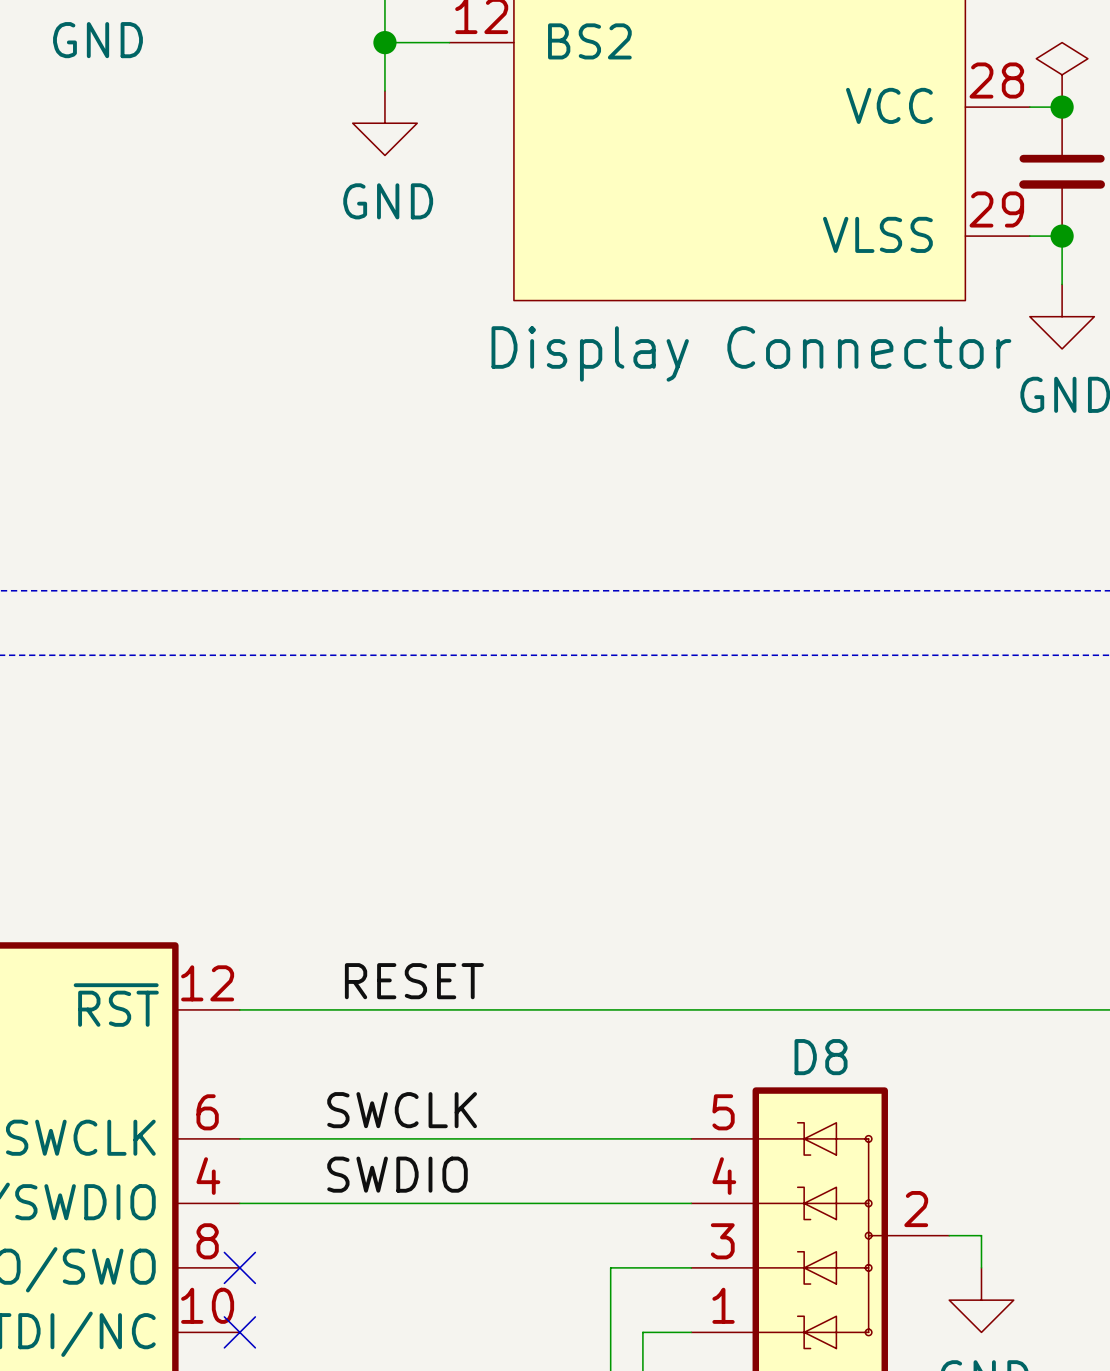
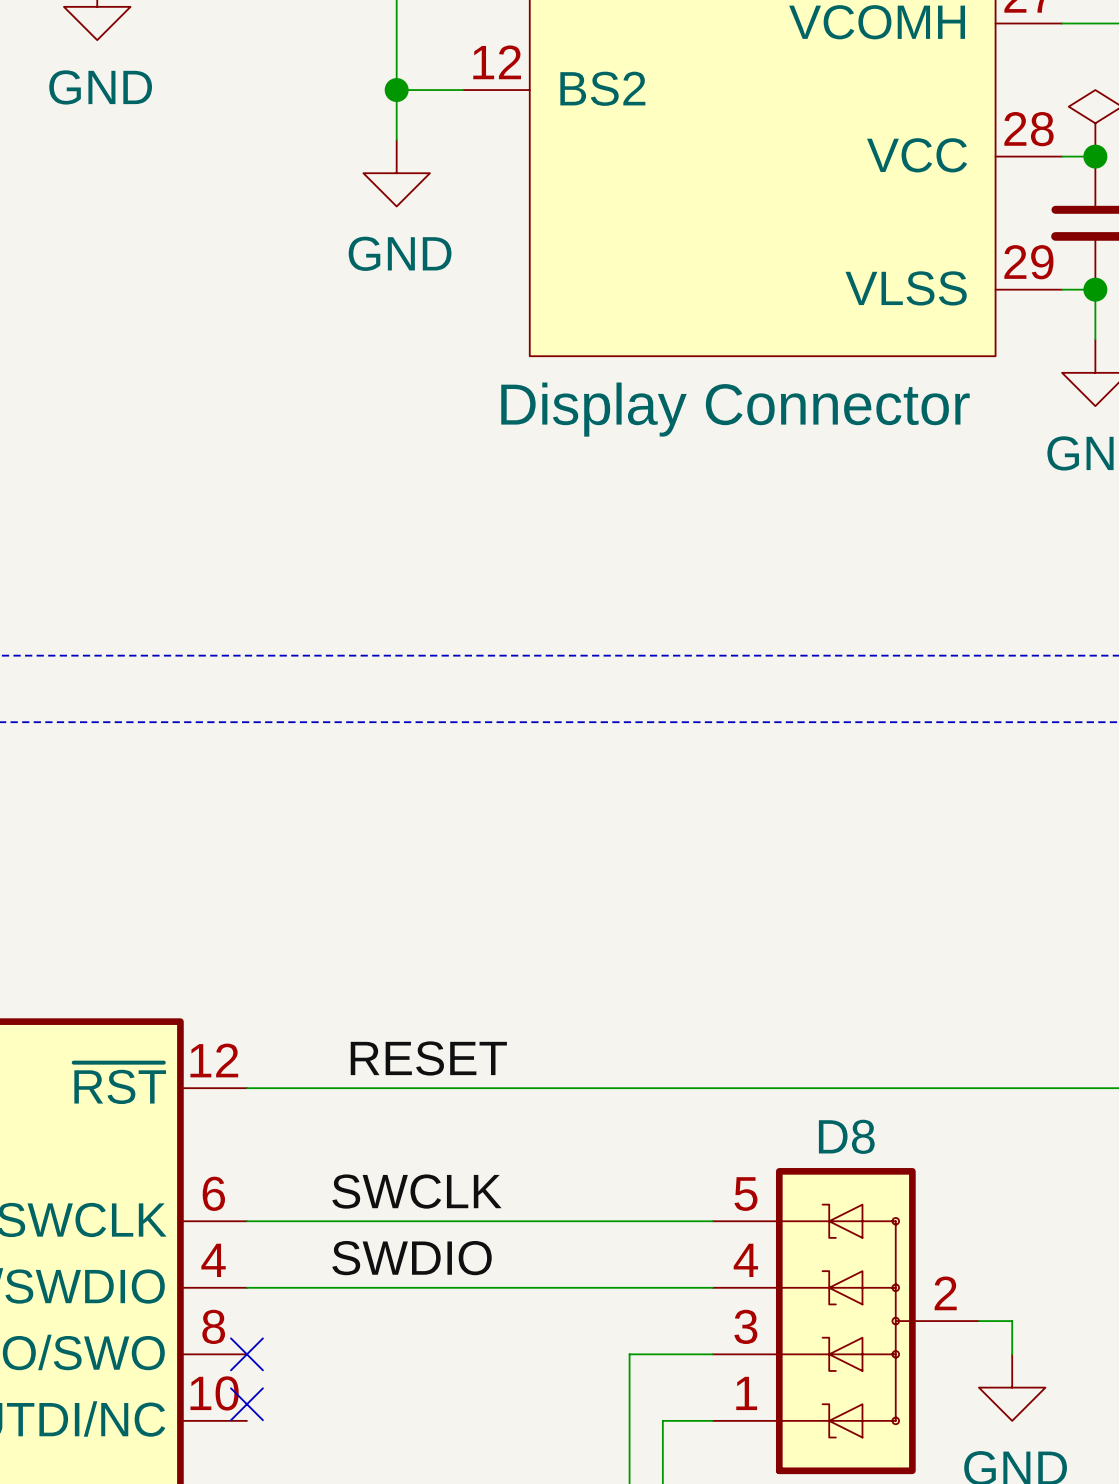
no-connect mark position: (239, 1332) -> (246, 1404)

